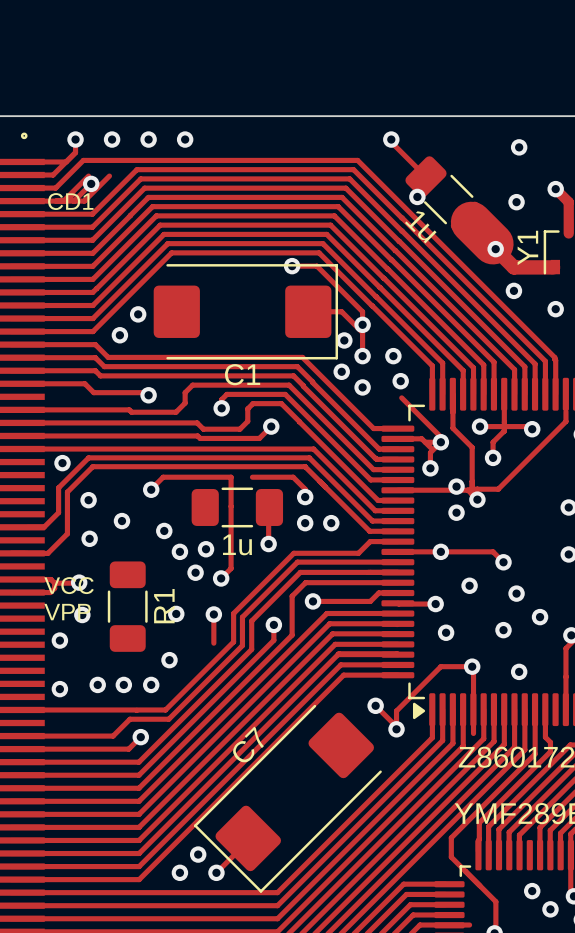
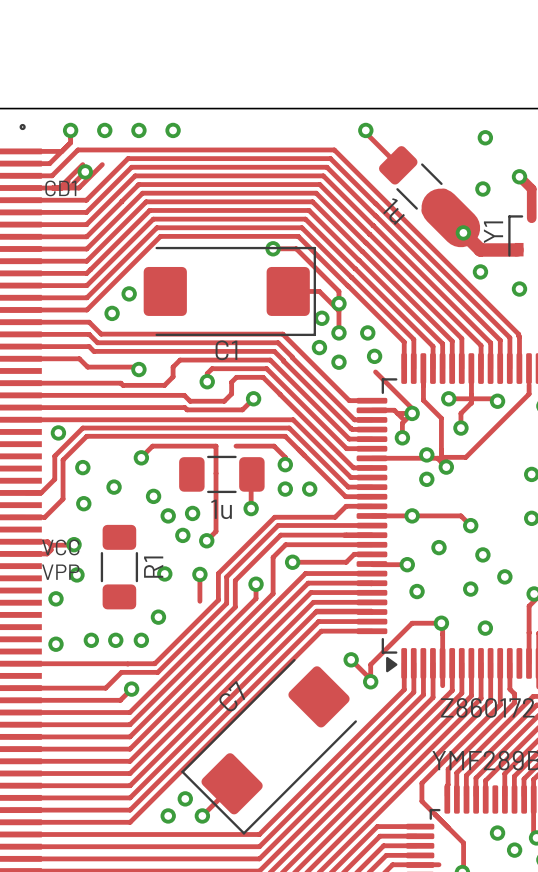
via: (417, 196) -> none

